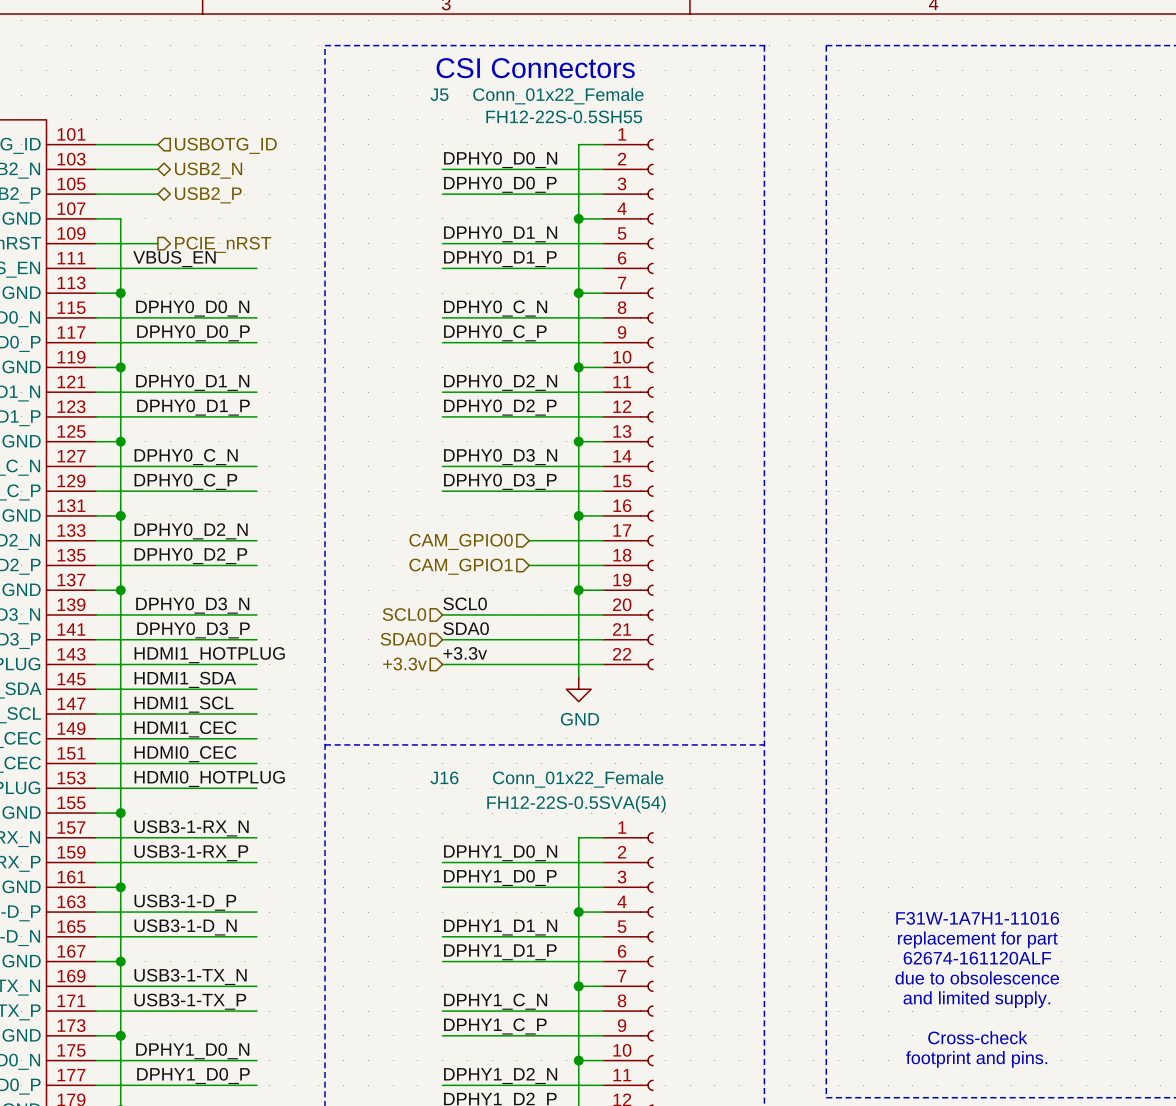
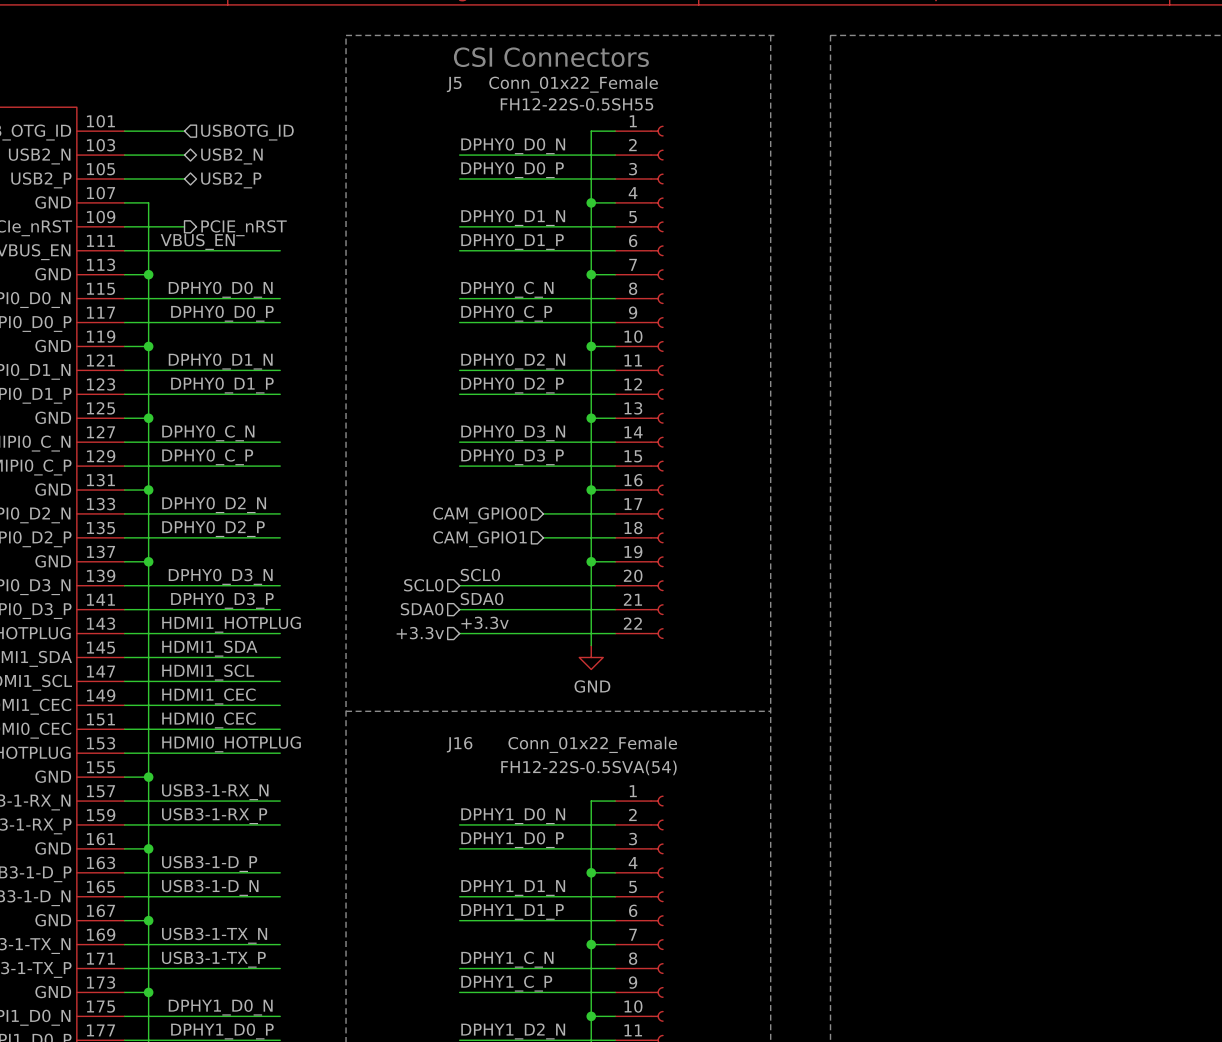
text: F31W-1A7H1-11016 (977, 918) -> none
text: replacement for part (977, 939) -> none
text: 62674-161120ALF (977, 958) -> none
text: due to obsolescence (977, 977) -> none
text: and limited supply. (976, 999) -> none
text: Cross-check (977, 1037) -> none
text: footprint and pins. (976, 1059) -> none

